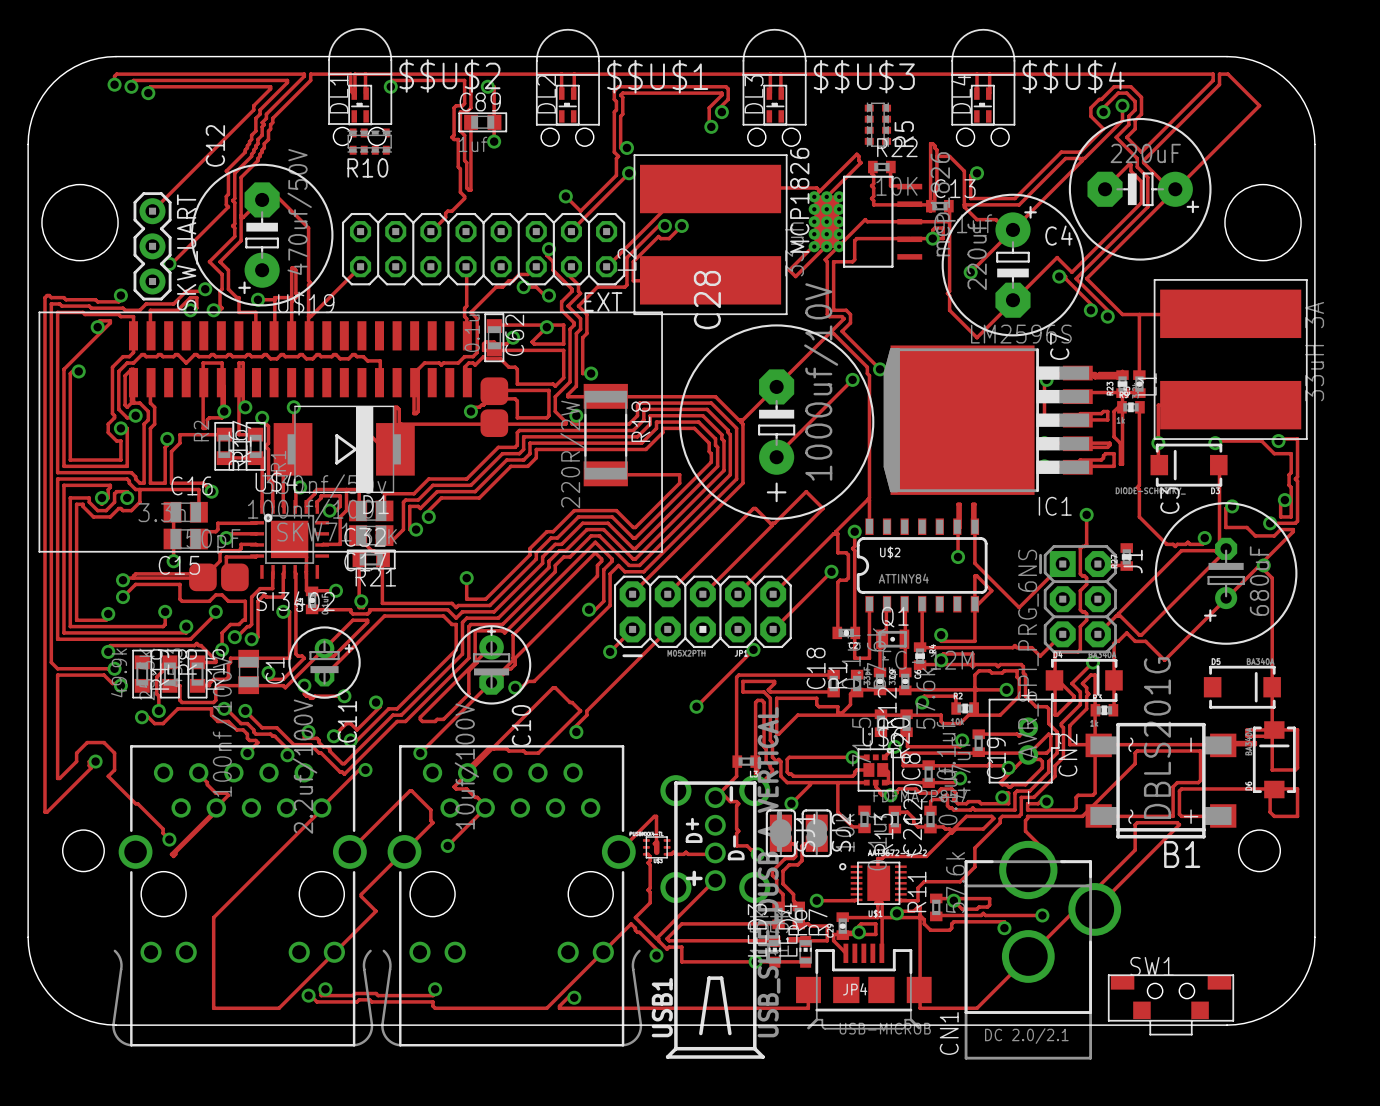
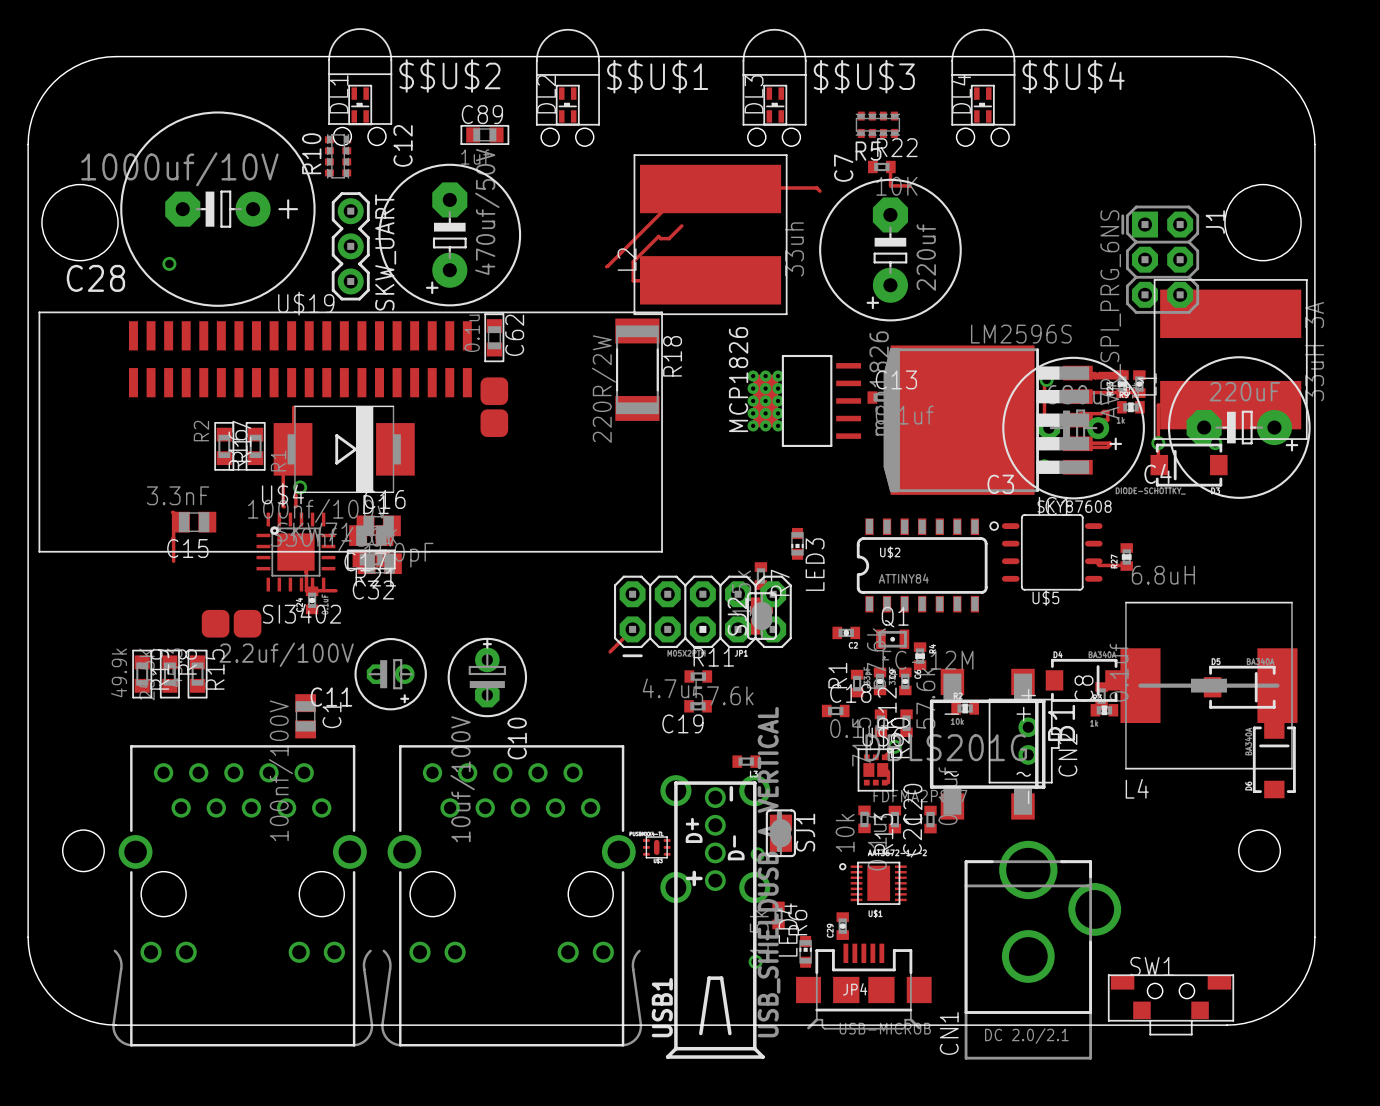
track: (365, 74) (366, 93) -> none
track: (470, 74) (470, 107) (466, 112) (460, 112) (460, 131) (464, 135) (466, 188) (468, 190) (470, 190) (471, 122) -> none
track: (561, 74) (561, 93) -> none
track: (574, 74) (573, 93) -> none
track: (770, 74) (769, 93) -> none
track: (780, 74) (781, 93) -> none
track: (977, 74) (976, 93) -> none
track: (989, 74) (988, 93) -> none
track: (114, 84) (114, 76) (116, 74) (304, 74) (266, 114) (266, 118) (262, 122) (264, 124) (262, 126) (262, 135) (257, 139) (251, 156) (234, 173) (234, 198) (232, 200) (234, 202) (234, 223) (232, 225) (234, 228) (234, 236) (209, 261) (222, 274) (222, 289) (220, 291) (220, 306) (222, 308) (217, 312) (213, 310) -> none
via: (114, 84) -> none
track: (131, 86) (133, 80) (287, 80) (260, 109) (260, 114) (255, 118) (255, 131) (251, 135) (245, 152) (226, 171) (228, 173) (226, 204) (228, 206) (169, 263) -> none
via: (131, 86) -> none
track: (390, 86) (392, 80) (464, 80) (464, 103) (454, 107) (454, 135) (451, 137) (458, 139) (460, 192) (464, 198) (451, 211) (447, 211) (445, 217) (430, 231) -> none
via: (390, 86) -> none
track: (487, 86) (494, 86) (494, 141) -> none
via: (487, 86) -> none
track: (148, 93) (150, 86) (270, 86) (253, 105) (253, 109) (152, 211) -> none
via: (148, 93) -> none
track: (1122, 105) (1122, 120) (1081, 159) -> none
via: (1122, 105) -> none
track: (721, 112) (719, 107) (728, 99) (728, 88) (726, 86) (618, 86) (614, 91) (614, 99) (616, 101) (616, 109) (614, 112) (614, 152) (618, 156) (616, 158) (616, 175) (580, 211) (565, 196) -> none
via: (721, 112) -> none
track: (1103, 112) (1103, 107) (1118, 93) (1126, 93) (1135, 101) (1135, 109) (1128, 116) (1128, 124) (1116, 137) (1137, 158) (1137, 166) (1147, 177) (1147, 206) (1076, 278) (1109, 312) (1107, 316) -> none
via: (1103, 112) -> none
C89 position: (482, 122) -> (484, 134)
R5 rotation: 0° (877, 124) -> 90° clockwise (877, 124)
track: (711, 126) (709, 124) (709, 107) (721, 93) (622, 93) (620, 95) (622, 97) (620, 147) (622, 150) (626, 147) -> none
via: (711, 126) -> none
R10 rotation: 0° (369, 141) -> 90° clockwise (338, 156)
R10 position: (369, 141) -> (338, 156)
via: (494, 141) -> none
via: (626, 147) -> none
track: (936, 156) (949, 156) (964, 171) (964, 206) (977, 219) (995, 219) (1010, 232) (970, 272) -> none
track: (872, 167) (873, 171) (871, 173) (873, 175) (873, 183) (871, 185) (873, 188) (873, 196) (871, 198) (873, 204) (928, 204) (930, 211) (934, 206) (934, 192) (936, 190) (936, 150) (932, 143) (930, 143) (930, 206) -> none
track: (629, 173) (571, 231) -> none
via: (629, 173) -> none
track: (977, 173) (970, 175) (970, 198) (1014, 198) (1061, 152) (1080, 152) (1103, 128) (1090, 116) (1090, 107) (1114, 86) (1130, 86) (1141, 97) (1141, 114) (1135, 120) (1135, 128) (1126, 137) (1141, 152) (1213, 80) (1213, 74) (354, 74) (354, 93) (350, 91) (350, 74) (310, 74) (310, 80) (272, 118) (268, 131) (268, 139) (264, 143) (257, 160) (241, 177) (241, 215) (243, 217) (270, 190) (308, 228) (308, 280) (310, 282) (308, 285) (309, 335) -> none
via: (977, 173) -> none
track: (1105, 189) (1130, 164) (1130, 171) (1141, 181) (1141, 202) (1071, 272) (1057, 257) (977, 337) (949, 310) (949, 295) (947, 293) (949, 291) (948, 206) -> none
C4 position: (1140, 189) -> (1239, 427)
track: (1175, 189) (1259, 105) (1227, 74) (1219, 74) (1219, 84) (1143, 160) (1173, 192) (1086, 278) (1122, 314) (1230, 313) -> none
via: (565, 196) -> none
track: (827, 196) (861, 162) (856, 154) (814, 196) -> none
track: (964, 204) (1019, 204) (1065, 158) (1080, 158) (1082, 160) (1012, 229) -> none
C13 position: (939, 206) -> (881, 397)
track: (242, 216) (241, 240) (220, 261) (228, 270) (228, 289) (238, 297) (238, 312) (255, 312) (256, 335) -> none
MCP1826 position: (865, 221) -> (804, 400)
track: (909, 221) (867, 221) (865, 219) (837, 247) -> none
track: (909, 221) (949, 221) -> none
track: (664, 225) (660, 223) (626, 257) (626, 285) (624, 287) (597, 287) (578, 306) (586, 314) (586, 333) (582, 337) (582, 373) (591, 373) -> none
via: (664, 225) -> none
via: (681, 225) -> none
C12 position: (262, 235) -> (449, 235)
track: (932, 238) (943, 238) (943, 228) (934, 228) (930, 238) (856, 238) (854, 240) (854, 259) (852, 261) (833, 261) (833, 310) (846, 310) (850, 314) (850, 322) (842, 331) (880, 369) -> none
via: (932, 238) -> none
SKW_UART position: (152, 246) -> (350, 246)
track: (814, 246) (789, 270) (795, 276) (825, 247) -> none
track: (837, 247) (825, 259) (827, 261) (827, 314) (829, 316) (842, 316) (844, 318) (740, 422) (742, 424) (742, 483) (632, 594) -> none
EXT: (483, 249) -> none
track: (548, 249) (546, 255) (553, 261) (553, 270) (572, 289) (561, 301) (561, 310) (574, 322) (570, 329) (570, 381) (555, 396) (555, 411) (565, 424) (401, 424) (399, 426) (399, 445) (395, 449) (399, 409) (395, 407) (395, 445) (380, 445) (363, 428) (359, 428) (358, 510) -> none
via: (548, 249) -> none
C7 rotation: 0° (1012, 265) -> 180° (890, 250)
C7 position: (1012, 265) -> (890, 250)
track: (360, 266) (308, 316) -> none
track: (466, 266) (466, 306) (464, 308) (464, 316) (466, 318) (467, 335) -> none
track: (536, 266) (527, 274) (519, 274) (502, 287) (496, 287) (470, 312) (477, 318) (477, 352) (473, 356) (464, 356) (458, 363) (443, 363) (441, 365) (439, 363) (424, 363) (418, 369) (418, 411) (416, 413) (414, 413) (414, 382) -> none
track: (571, 266) (565, 272) (578, 285) (578, 291) (580, 293) (567, 306) (580, 318) (580, 329) (576, 333) (576, 386) (567, 396) (715, 396) (741, 421) -> none
via: (970, 272) -> none
track: (1059, 276) (1061, 272) (1092, 306) (1090, 310) -> none
via: (1059, 276) -> none
track: (523, 287) (536, 287) (544, 295) (548, 295) -> none
via: (523, 287) -> none
track: (205, 289) (203, 291) (186, 291) (173, 303) (146, 303) (139, 310) (51, 303) (51, 662) (57, 668) (108, 668) (110, 670) (114, 668) -> none
via: (205, 289) -> none
track: (120, 295) (118, 301) (66, 299) (63, 297) (51, 297) (49, 295) (44, 297) (44, 812) (91, 767) (89, 761) (91, 759) (95, 761) -> none
via: (120, 295) -> none
via: (548, 295) -> none
track: (257, 299) (274, 299) -> none
via: (257, 299) -> none
track: (190, 310) (196, 308) (196, 297) (190, 297) (177, 310) (150, 310) (151, 335) -> none
via: (190, 310) -> none
via: (213, 310) -> none
via: (1090, 310) -> none
track: (1139, 314) (1139, 375) -> none
via: (1107, 316) -> none
track: (494, 326) (563, 325) (563, 344) (534, 344) (532, 341) (546, 327) -> none
track: (97, 327) (99, 320) (110, 320) (63, 369) (63, 466) (127, 466) (127, 428) (120, 428) -> none
via: (97, 327) -> none
via: (546, 327) -> none
track: (830, 332) (867, 367) (867, 373) (869, 375) (869, 497) (835, 531) (837, 533) (837, 552) (846, 552) (848, 554) (848, 578) (837, 582) (837, 632) -> none
track: (133, 335) (133, 316) (57, 312) (57, 472) (131, 472) (139, 483) (144, 483) (144, 424) (148, 419) (148, 411) (139, 403) (133, 403) (131, 400) (131, 386) (133, 386) (133, 400) (127, 407) (125, 405) (125, 375) (131, 369) (133, 369) (133, 382) -> none
track: (133, 335) (133, 352) (129, 356) (123, 356) (112, 367) (112, 413) (114, 417) (108, 424) (108, 432) (116, 441) (120, 441) (120, 460) (70, 460) (70, 373) (74, 369) (78, 371) -> none
track: (291, 335) (291, 301) (298, 295) (295, 293) (295, 270) (293, 268) (291, 268) (291, 297) (274, 297) (274, 335) -> none
track: (513, 337) (506, 344) (485, 341) (483, 344) (483, 350) (563, 350) (563, 377) (555, 386) (553, 384) (517, 384) (517, 369) (515, 367) (508, 367) (500, 358) (485, 358) (483, 356) (475, 365) (468, 363) (464, 367) (466, 369) (467, 382) -> none
via: (513, 337) -> none
via: (880, 369) -> none
via: (78, 371) -> none
via: (591, 373) -> none
track: (852, 379) (776, 457) -> none
via: (852, 379) -> none
track: (151, 382) (150, 403) (154, 407) (154, 424) (150, 428) (150, 483) (165, 483) (165, 447) (167, 445) (167, 438) -> none
track: (221, 382) (222, 363) (203, 363) (203, 428) (207, 426) (207, 419) (209, 417) (222, 417) (222, 386) (224, 386) (224, 411) -> none
track: (379, 382) (380, 360) (367, 360) (363, 356) (357, 356) (354, 354) (348, 358) (340, 358) (335, 354) (331, 356) (317, 354) (312, 358) (306, 358) (302, 354) (298, 356) (285, 356) (281, 354) (276, 358) (270, 358) (266, 354) (262, 356) (251, 356) (249, 354) (245, 356) (232, 356) (230, 354) (226, 356) (215, 356) (213, 354) (198, 356) (194, 354) (186, 363) (177, 354) (173, 356) (163, 356) (160, 354) (146, 356) (141, 354) (133, 363) (127, 363) (118, 371) (118, 409) (127, 417) (133, 417) (135, 415) -> none
track: (494, 391) (548, 390) (548, 415) (546, 417) (517, 417) (517, 400) (515, 398) (489, 398) (479, 407) (473, 407) (470, 411) -> none
track: (1122, 392) (1122, 405) (1114, 411) (1114, 436) (1120, 443) (1120, 464) (1122, 464) (1121, 407) -> none
track: (245, 407) (243, 405) (243, 363) (238, 363) (238, 434) (255, 434) -> none
via: (245, 407) -> none
via: (293, 407) -> none
track: (1139, 407) (1139, 485) (1137, 487) (1139, 489) (1139, 516) (1166, 544) (1173, 544) (1175, 546) (1187, 542) (1189, 544) (1202, 544) (1204, 538) -> none
via: (224, 411) -> none
via: (470, 411) -> none
via: (135, 415) -> none
track: (576, 415) (572, 424) (629, 424) (637, 415) (637, 405) (639, 403) (711, 403) (736, 428) (736, 478) (643, 571) (624, 571) (618, 565) (610, 573) (610, 605) (534, 681) (527, 681) (519, 689) (515, 687) -> none
via: (576, 415) -> none
track: (262, 417) (268, 426) (268, 443) (266, 447) (268, 449) (268, 478) (272, 481) (273, 506) -> none
via: (262, 417) -> none
C28 rotation: 0° (776, 422) -> 90° counterclockwise (217, 209)
C28 position: (776, 422) -> (217, 209)
via: (120, 428) -> none
track: (224, 434) (179, 434) (179, 443) (171, 451) (171, 483) (203, 483) (211, 491) -> none
R18 position: (605, 435) -> (637, 369)
via: (167, 438) -> none
track: (1278, 441) (1280, 438) (1297, 438) (1297, 476) (1295, 478) (1297, 481) (1297, 521) (1295, 523) (1270, 523) -> none
via: (1278, 441) -> none
track: (1215, 443) (1219, 441) (1261, 441) (1274, 453) (1291, 453) (1291, 472) (1289, 474) (1291, 516) (1280, 516) (1280, 504) (1284, 500) -> none
track: (224, 458) (262, 457) (261, 506) -> none
track: (1218, 465) (1219, 552) (1221, 554) (1141, 635) (1118, 613) (1181, 550) (1215, 550) (1219, 554) (1221, 552) (1223, 552) (1226, 548) -> none
track: (1044, 466) (1074, 466) (1080, 460) (1101, 460) (1105, 453) (1114, 453) (1114, 466) (1077, 467) -> none
track: (605, 473) (679, 474) (679, 483) (635, 527) (616, 510) (574, 510) (553, 531) (546, 531) (529, 548) (529, 554) (485, 599) (466, 599) (466, 578) -> none
track: (139, 489) (139, 502) (131, 510) (118, 508) (110, 516) (93, 516) (82, 504) (76, 504) (76, 620) (106, 620) (108, 613) -> none
track: (346, 489) (346, 510) (340, 516) (340, 544) (322, 544) -> none
track: (359, 489) (317, 489) (306, 502) (306, 506) -> none
via: (211, 491) -> none
track: (101, 497) (97, 500) (101, 504) (108, 497) (110, 485) (63, 485) (63, 632) (186, 632) (188, 630) (186, 626) -> none
via: (101, 497) -> none
track: (127, 497) (129, 493) (127, 491) (116, 491) (114, 493) (114, 502) (106, 510) (97, 510) (89, 502) (89, 497) (70, 497) (70, 626) (163, 626) (165, 624) (165, 611) -> none
via: (127, 497) -> none
track: (868, 499) (869, 526) -> none
via: (1284, 500) -> none
track: (317, 506) (317, 502) (321, 495) (340, 495) (340, 506) (335, 510) (329, 510) -> none
track: (1232, 506) (1225, 508) (1225, 527) (1246, 527) (1255, 535) (1274, 535) (1280, 529) (1293, 529) (1261, 563) (1263, 565) -> none
via: (1232, 506) -> none
via: (329, 510) -> none
C32 position: (371, 510) -> (379, 563)
track: (384, 510) (384, 493) (414, 493) (428, 478) (466, 478) (498, 447) (515, 447) (517, 445) (517, 432) (519, 430) (633, 430) (643, 419) (643, 409) (707, 409) (730, 434) (730, 474) (639, 565) (629, 565) (599, 535) (591, 535) (570, 557) (563, 557) (555, 565) (555, 571) (502, 624) (470, 624) (468, 626) (468, 658) (405, 721) (397, 721) (344, 774) (310, 744) (293, 744) (276, 727) (262, 727) (245, 710) -> none
C16 position: (185, 512) -> (378, 525)
track: (198, 512) (198, 489) (135, 489) (127, 478) (57, 478) (57, 639) (190, 639) (215, 611) -> none
track: (1086, 514) (1086, 544) (1080, 548) (1080, 573) (1086, 578) (1086, 584) (1080, 590) (1080, 609) (1086, 613) (1086, 620) (1080, 626) (1080, 649) (1078, 651) (1055, 651) (1055, 677) (1074, 696) (1057, 715) (1055, 715) (1054, 680) -> none
via: (1086, 514) -> none
track: (428, 516) (426, 512) (441, 497) (479, 497) (511, 466) (527, 466) (536, 457) (536, 449) (645, 449) (662, 432) (662, 428) (694, 428) (709, 443) (711, 462) (635, 538) (612, 516) (578, 516) (557, 538) (551, 538) (536, 552) (536, 559) (489, 605) (458, 605) (456, 607) (451, 603) (382, 603) (382, 554) (378, 554) (363, 542) (359, 542) (358, 535) -> none
via: (428, 516) -> none
track: (257, 522) (217, 523) (217, 529) (215, 531) (198, 531) (198, 539) -> none
via: (1270, 523) -> none
track: (771, 524) (806, 491) (823, 508) (738, 594) -> none
track: (957, 526) (958, 504) (960, 504) (958, 557) -> none
track: (974, 526) (974, 504) (972, 504) (974, 563) (1019, 607) (1062, 564) -> none
track: (416, 529) (409, 529) (409, 506) (418, 506) (420, 508) (437, 491) (475, 491) (506, 460) (523, 460) (529, 453) (529, 443) (641, 443) (656, 428) (656, 422) (698, 422) (715, 438) (717, 466) (635, 548) (608, 523) (582, 523) (561, 544) (555, 544) (542, 557) (542, 563) (494, 611) (462, 611) (456, 618) (447, 609) (369, 609) (367, 613) (352, 613) (350, 609) (312, 609) -> none
via: (416, 529) -> none
track: (854, 531) (854, 546) (852, 548) (854, 550) (854, 658) (869, 658) (869, 604) -> none
via: (854, 531) -> none
track: (836, 532) (773, 594) -> none
track: (257, 533) (224, 533) (226, 538) -> none
track: (384, 535) (384, 542) (390, 542) (403, 529) (403, 502) (405, 500) (418, 500) (432, 485) (470, 485) (502, 453) (519, 453) (523, 449) (523, 436) (637, 436) (650, 424) (650, 415) (702, 415) (721, 434) (723, 441) (723, 470) (635, 559) (603, 529) (586, 529) (565, 550) (559, 550) (548, 561) (548, 567) (498, 618) (466, 618) (462, 622) (462, 654) (401, 715) (392, 715) (344, 763) (327, 746) (323, 746) (317, 738) (304, 738) (308, 732) -> none
via: (226, 538) -> none
via: (1204, 538) -> none
C15 position: (185, 539) -> (194, 522)
U$4 position: (289, 539) -> (295, 552)
track: (257, 544) (241, 544) (238, 550) (222, 550) (220, 552) (220, 561) (207, 573) (135, 573) (133, 578) -> none
U$5: none -> SKY87608 (1045, 552)
track: (257, 556) (226, 557) (226, 575) (228, 578) (234, 577) -> none
via: (958, 557) -> none
track: (359, 559) (359, 607) (363, 607) (361, 601) -> none
via: (173, 561) -> none
via: (1263, 565) -> none
track: (273, 571) (272, 588) (260, 588) (251, 597) (251, 624) (234, 637) -> none
track: (284, 571) (283, 597) (266, 597) (264, 594) (257, 601) (257, 637) (251, 639) -> none
track: (295, 571) (295, 654) (304, 658) (283, 679) (268, 679) (268, 672) -> none
track: (831, 571) (773, 629) -> none
via: (831, 571) -> none
C3 rotation: 0° (1226, 573) -> 90° counterclockwise (1073, 428)
C3 position: (1226, 573) -> (1073, 428)
track: (202, 577) (125, 578) (123, 580) -> none
part position: (218, 577) -> (231, 623)
via: (466, 578) -> none
via: (123, 580) -> none
via: (335, 590) -> none
track: (667, 594) (755, 508) (772, 525) (702, 594) -> none
track: (123, 597) (135, 584) (179, 584) (179, 599) (182, 601) (209, 601) (215, 594) (222, 594) (228, 601) (245, 601) (245, 620) (238, 624) (230, 624) (222, 632) (222, 649) -> none
via: (123, 597) -> none
J1 position: (1078, 599) -> (1160, 259)
via: (361, 601) -> none
track: (887, 604) (886, 645) (880, 645) (880, 639) (880, 639) (880, 672) -> none
track: (904, 604) (905, 672) -> none
track: (922, 604) (922, 647) (920, 647) (920, 647) (1012, 647) (1014, 645) (1017, 647) (1031, 647) (1040, 656) (1062, 634) -> none
track: (974, 604) (974, 575) (977, 575) (991, 590) (974, 607) (974, 641) (941, 641) (941, 635) -> none
track: (589, 609) (593, 611) (603, 601) (603, 569) (612, 561) (595, 542) (504, 632) (502, 630) (475, 630) (475, 660) (477, 662) (468, 670) (468, 694) (443, 719) (422, 721) (420, 717) (489, 647) (491, 647) -> none
via: (589, 609) -> none
via: (165, 611) -> none
via: (215, 611) -> none
track: (283, 611) (289, 611) (289, 658) (230, 658) (228, 677) (226, 679) (213, 679) (209, 685) (197, 685) -> none
via: (283, 611) -> none
via: (108, 613) -> none
track: (1119, 615) (1097, 634) -> none
via: (186, 626) -> none
track: (667, 629) (586, 710) (586, 715) (574, 727) (576, 732) -> none
via: (941, 635) -> none
via: (234, 637) -> none
via: (251, 639) -> none
track: (324, 648) (352, 620) (367, 620) (333, 656) (325, 656) (321, 651) (285, 687) (283, 685) (217, 685) (215, 687) (215, 700) (213, 702) (182, 702) (179, 700) (179, 685) (169, 685) -> none
via: (222, 649) -> none
track: (753, 649) (696, 706) -> none
via: (753, 649) -> none
track: (108, 651) (110, 645) (194, 645) (196, 643) (215, 660) (215, 662) (197, 662) -> none
via: (108, 651) -> none
via: (610, 651) -> none
track: (941, 660) (943, 654) (972, 654) (972, 664) (920, 665) -> none
via: (941, 660) -> none
track: (169, 662) (163, 664) (163, 670) (156, 677) (158, 710) -> none
C11 rotation: 0° (324, 662) -> 90° clockwise (390, 674)
C11 position: (324, 662) -> (390, 674)
track: (1092, 662) (1071, 683) (1080, 691) (1080, 704) (1061, 723) (1063, 727) (1063, 757) (1055, 765) (1055, 776) (1033, 797) (1021, 797) (1021, 814) (1019, 816) (1002, 816) (1000, 818) (1000, 822) (974, 848) (974, 866) (960, 881) (924, 881) (917, 888) (917, 900) (900, 899) -> none
via: (1092, 662) -> none
C10 position: (491, 664) -> (487, 677)
track: (970, 664) (972, 666) (974, 664) (995, 664) (998, 666) (1000, 664) (1021, 664) (1023, 666) (1023, 672) (1025, 675) (1025, 696) (1036, 706) (1046, 706) (1048, 708) (1048, 723) (1057, 732) (1057, 753) (1048, 761) (1048, 772) (1029, 791) (1017, 791) (1014, 793) (1014, 810) (974, 810) (972, 807) (970, 810) (953, 810) (947, 805) (947, 795) (945, 795) (941, 799) (932, 799) (930, 801) (930, 810) -> none
via: (114, 668) -> none
C1 position: (248, 671) -> (305, 716)
via: (268, 672) -> none
track: (833, 674) (738, 675) (736, 677) (736, 776) (715, 797) -> none
track: (324, 676) (384, 616) (443, 616) (451, 624) (456, 624) (456, 649) (397, 708) (388, 708) (354, 742) (350, 740) -> none
track: (491, 682) (492, 681) (597, 575) (597, 565) (601, 559) (595, 552) (513, 635) (513, 658) (515, 660) (515, 664) (492, 685) (487, 685) (420, 753) -> none
C18 rotation: 0° (833, 683) -> 90° clockwise (835, 710)
C18 position: (833, 683) -> (835, 710)
track: (120, 685) (118, 683) (112, 683) (104, 675) (57, 675) (57, 778) (76, 761) (76, 753) (87, 742) (104, 742) (114, 753) (114, 769) (108, 776) (163, 829) (163, 833) (169, 839) -> none
via: (120, 685) -> none
track: (304, 685) (304, 694) (310, 698) (314, 696) (344, 696) -> none
via: (304, 685) -> none
L4: none -> 6.8uH (1208, 685)
via: (515, 687) -> none
track: (1006, 689) (977, 689) (974, 687) (974, 675) (979, 670) (989, 670) (991, 672) (1017, 670) (1019, 696) (1000, 715) (968, 715) (960, 723) (943, 723) (941, 721) (941, 715) (797, 715) (776, 734) (776, 698) (816, 698) (816, 704) (818, 706) (837, 706) (837, 713) (842, 713) (850, 704) (852, 689) (858, 689) (857, 692) (861, 689) (974, 689) (974, 708) -> none
via: (1006, 689) -> none
track: (833, 692) (770, 691) (768, 689) (774, 681) (742, 681) (742, 691) (764, 691) (770, 698) (770, 740) (772, 742) (772, 757) (776, 761) (778, 759) (780, 761) (780, 776) (787, 782) (866, 782) -> none
via: (344, 696) -> none
track: (376, 702) (380, 706) (357, 729) (350, 723) (346, 723) (333, 736) -> none
via: (376, 702) -> none
track: (922, 702) (924, 696) (955, 696) (956, 708) -> none
via: (922, 702) -> none
via: (696, 706) -> none
track: (224, 708) (241, 723) (247, 723) (255, 734) (270, 734) (274, 736) (289, 751) (287, 755) -> none
via: (224, 708) -> none
via: (158, 710) -> none
via: (245, 710) -> none
track: (1113, 710) (1114, 643) (1116, 641) (1126, 632) (1135, 641) (1145, 641) (1164, 660) (1259, 565) (1272, 578) (1272, 727) (1278, 729) (1297, 729) (1297, 767) (1295, 769) (1272, 769) (1272, 736) (1246, 736) (1246, 729) (1274, 729) -> none
track: (141, 717) (148, 717) (154, 723) (163, 723) (177, 708) (211, 708) (211, 715) (217, 721) (228, 721) (236, 729) (243, 729) (249, 740) (255, 740) (257, 742) (247, 753) -> none
via: (141, 717) -> none
track: (1028, 727) (1019, 736) (1017, 734) (978, 734) -> none
via: (308, 732) -> none
via: (576, 732) -> none
track: (906, 732) (907, 746) (960, 746) (962, 740) -> none
via: (333, 736) -> none
via: (350, 740) -> none
via: (962, 740) -> none
C19 rotation: 0° (978, 743) -> 90° clockwise (698, 706)
C19 position: (978, 743) -> (698, 706)
track: (1223, 745) (1255, 744) (1255, 742) (1221, 742) (1219, 744) (1095, 744) (1095, 675) (1090, 675) (1082, 683) (1088, 694) (1086, 696) (1086, 708) (1069, 725) (1069, 744) (1092, 744) (1095, 746) (1095, 793) (1092, 795) (1078, 795) (1074, 810) (1027, 810) (1027, 803) (1038, 803) (1042, 799) (1046, 801) -> none
via: (247, 753) -> none
via: (420, 753) -> none
track: (1028, 754) (1014, 767) (1012, 765) (991, 765) (989, 763) (987, 765) (903, 765) (903, 755) (905, 753) (1025, 753) (1031, 751) (1048, 734) (1050, 736) (1050, 748) (1046, 753) (1031, 753) (1036, 759) (1042, 761) (1042, 767) (1025, 784) (1012, 784) (1010, 786) (1002, 784) (1000, 782) (1012, 769) (1008, 767) -> none
via: (287, 755) -> none
via: (852, 757) -> none
track: (866, 757) (789, 757) (787, 759) (787, 772) (793, 776) (852, 776) (856, 769) (868, 769) -> none
via: (95, 761) -> none
track: (755, 761) (755, 784) (757, 786) (772, 772) (766, 761) (766, 748) (764, 746) (764, 702) (761, 700) (755, 702) (755, 757) (757, 759) (757, 780) (759, 782) (755, 786) (754, 790) -> none
via: (1008, 767) -> none
track: (365, 769) (361, 767) (213, 917) (213, 1008) (279, 1008) (376, 911) (361, 894) (432, 822) (430, 820) (430, 810) (409, 791) (349, 851) -> none
via: (365, 769) -> none
track: (198, 772) (215, 793) (226, 793) (228, 795) (217, 805) (220, 807) (173, 856) (171, 854) (216, 807) -> none
track: (467, 772) (468, 772) (553, 687) (580, 710) (538, 753) (508, 751) (506, 748) (494, 748) (492, 746) (489, 746) (464, 772) (464, 776) (454, 786) (456, 788) (466, 788) (485, 807) (447, 845) -> none
C8 position: (928, 774) -> (1101, 696)
track: (960, 778) (958, 782) (884, 782) -> none
via: (960, 778) -> none
B1 rotation: 0° (1160, 780) -> 90° counterclockwise (987, 744)
B1 position: (1160, 780) -> (987, 744)
track: (810, 782) (791, 803) -> none
track: (837, 782) (837, 812) (852, 826) (864, 828) -> none
track: (875, 782) (875, 786) (882, 795) (894, 795) (898, 788) (915, 788) (920, 793) (936, 793) (941, 788) (951, 788) (955, 793) (953, 799) (958, 803) (966, 803) (968, 801) (1008, 803) (1008, 793) (1002, 797) -> none
track: (1274, 789) (1297, 788) (1297, 816) (1274, 816) (1270, 812) (1270, 788) (1181, 788) (1179, 791) (1179, 814) (1181, 816) (1223, 815) -> none
via: (890, 795) -> none
track: (715, 797) (721, 793) (730, 801) (736, 801) (738, 803) (736, 805) (736, 829) (738, 831) (736, 833) (736, 845) (747, 845) (757, 854) -> none
via: (1002, 797) -> none
via: (1046, 801) -> none
via: (791, 803) -> none
track: (894, 810) (907, 812) (917, 826) (930, 828) (930, 826) (943, 826) (951, 831) (966, 816) (991, 816) (993, 818) (983, 829) (955, 829) (926, 856) (884, 856) (877, 858) (877, 900) (875, 902) (877, 904) -> none
track: (1098, 815) (1173, 816) (1173, 786) (1177, 782) (1198, 782) (1200, 780) (1200, 751) (1137, 751) (1135, 753) (1135, 763) (1082, 816) (1027, 816) (1025, 831) (1046, 852) (1028, 869) -> none
SJ2 name position: SJ2 (841, 832) -> SJ2 (737, 616)
SJ2 position: (816, 833) -> (761, 616)
via: (169, 839) -> none
track: (780, 843) (793, 843) (795, 845) (795, 856) (793, 858) (785, 858) (772, 871) (772, 875) (776, 879) (776, 888) (783, 894) (783, 904) (778, 906) -> none
track: (816, 843) (804, 843) (801, 845) (801, 860) (797, 864) (789, 864) (783, 871) (783, 883) (793, 894) (793, 900) (798, 906) -> none
via: (447, 845) -> none
track: (656, 847) (654, 843) (656, 841) (656, 816) (654, 816) (618, 851) -> none
track: (715, 852) (711, 856) (709, 854) (688, 854) (686, 852) (683, 854) (675, 854) (673, 852) (667, 854) -> none
track: (646, 854) (650, 856) (648, 862) (650, 864) (650, 888) (648, 890) (650, 892) (650, 902) (635, 917) (656, 938) (715, 880) -> none
track: (936, 898) (989, 898) (989, 904) (977, 909) (962, 909) (953, 900) -> none
track: (856, 899) (816, 900) -> none
via: (816, 900) -> none
via: (953, 900) -> none
R11 rotation: 0° (936, 907) -> 90° clockwise (698, 676)
R11 position: (936, 907) -> (698, 676)
track: (1094, 909) (1179, 824) (1177, 822) (1137, 822) (1135, 824) (1135, 850) (977, 1008) (920, 1008) (920, 917) (882, 917) -> none
track: (896, 913) (898, 911) (913, 911) (920, 907) (920, 915) (930, 930) (949, 930) (953, 921) (1004, 921) (1004, 928) -> none
via: (896, 913) -> none
R7 position: (798, 915) -> (760, 576)
track: (1042, 915) (985, 915) (983, 913) (981, 915) (936, 916) -> none
via: (1042, 915) -> none
track: (842, 917) (877, 917) (877, 902) (882, 902) (881, 953) -> none
track: (778, 924) (681, 923) (667, 938) (669, 940) (774, 941) -> none
track: (798, 924) (827, 926) (827, 940) (789, 938) (789, 940) (805, 941) -> none
via: (1004, 928) -> none
via: (858, 932) -> none
track: (842, 935) (875, 934) (875, 923) (861, 923) (856, 932) (833, 934) (833, 940) (845, 953) -> none
track: (657, 937) (667, 949) (669, 947) (681, 947) (681, 961) (805, 962) -> none
LED3 rotation: 0° (774, 951) -> 180° (797, 543)
LED3 position: (774, 951) -> (797, 543)
track: (656, 955) (660, 953) (631, 923) (546, 1008) (435, 1008) (432, 1001) (371, 1001) (369, 999) (359, 999) (357, 1001) (317, 1001) (308, 995) -> none
via: (656, 955) -> none
track: (325, 989) (321, 995) (352, 995) (354, 993) (432, 995) (435, 989) -> none
via: (325, 989) -> none
via: (435, 989) -> none
track: (808, 989) (808, 1008) (559, 1008) (570, 995) (574, 997) -> none
via: (308, 995) -> none
via: (574, 997) -> none

